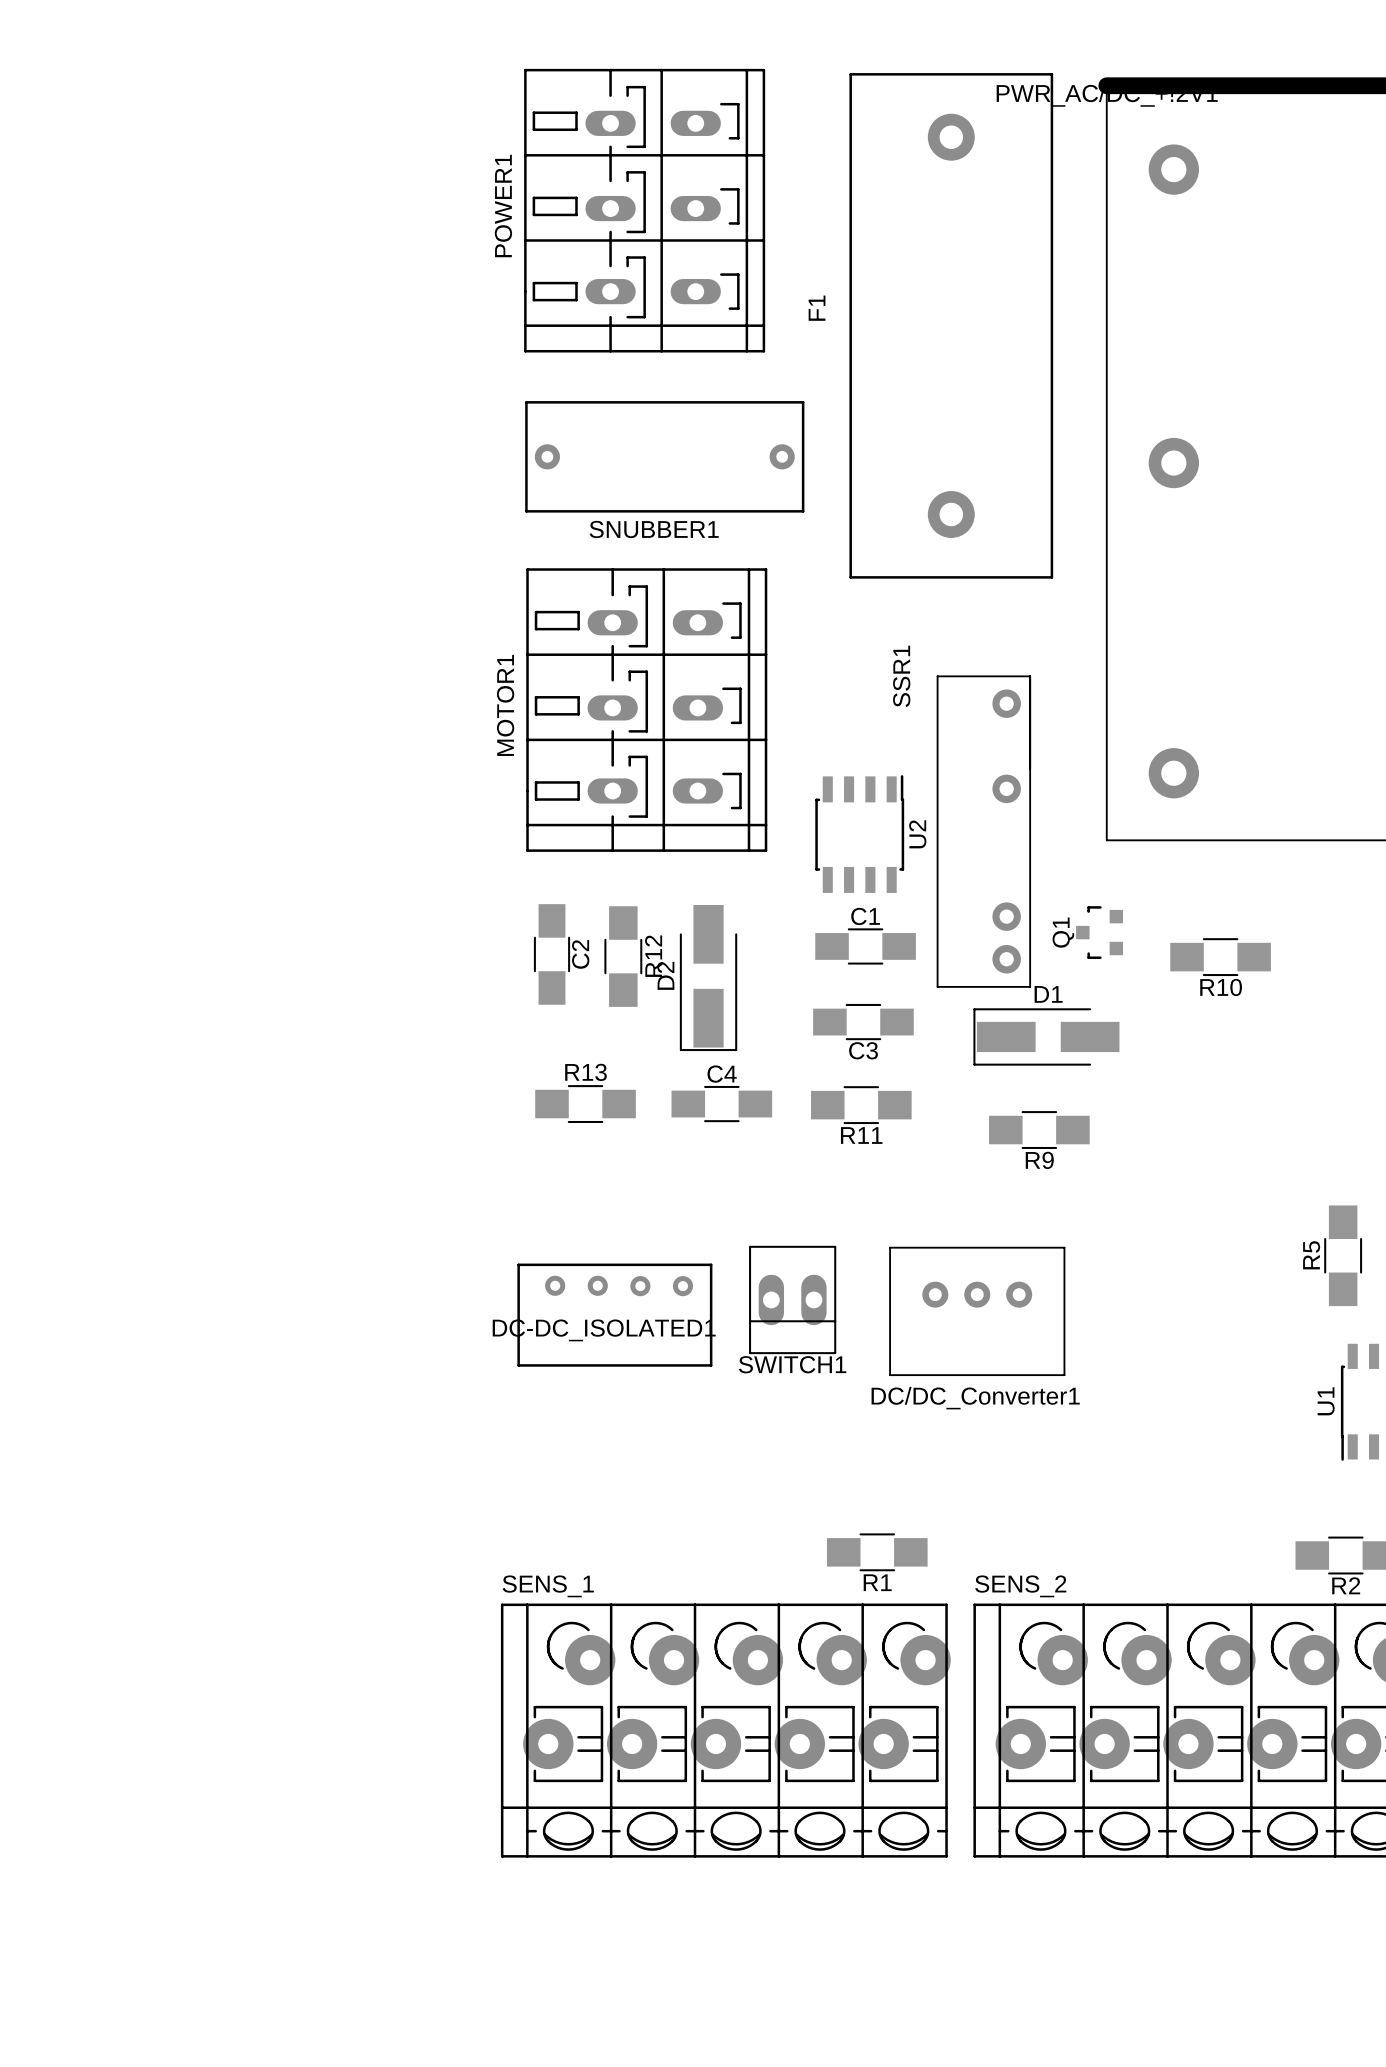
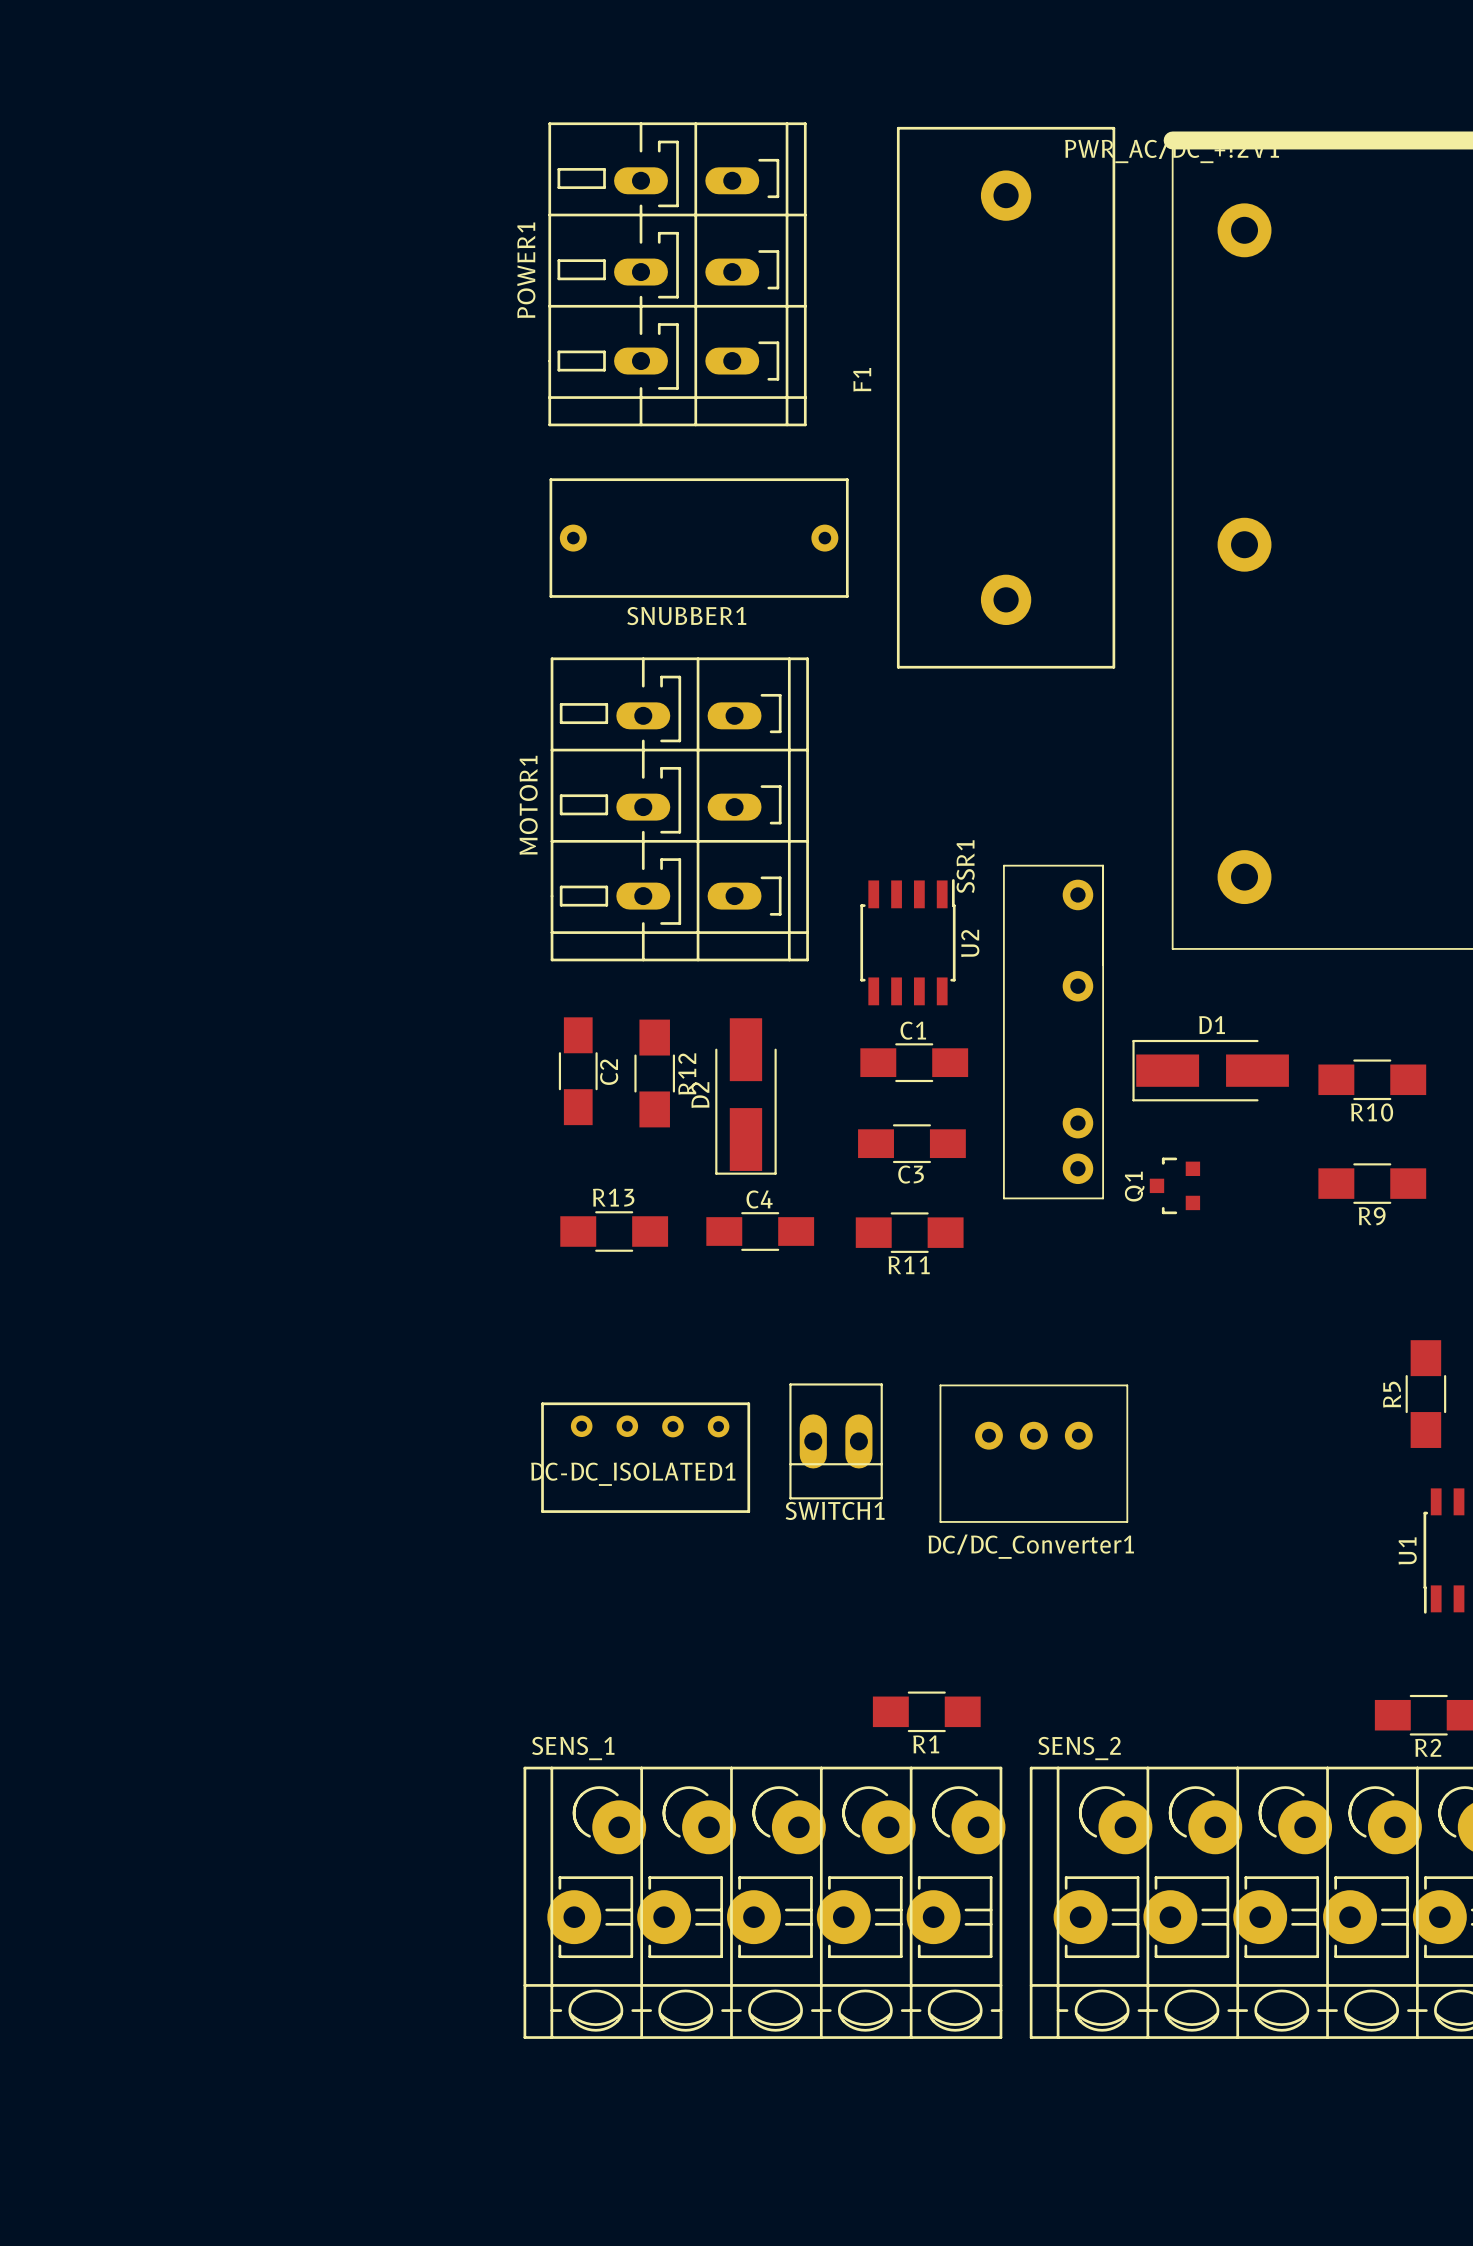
SSR1 position: (983, 831) -> (1053, 1032)
Q1 position: (1099, 932) -> (1174, 1185)
R10 position: (1220, 957) -> (1372, 1079)
D1 position: (1046, 1036) -> (1210, 1070)
R9 position: (1039, 1130) -> (1372, 1183)

